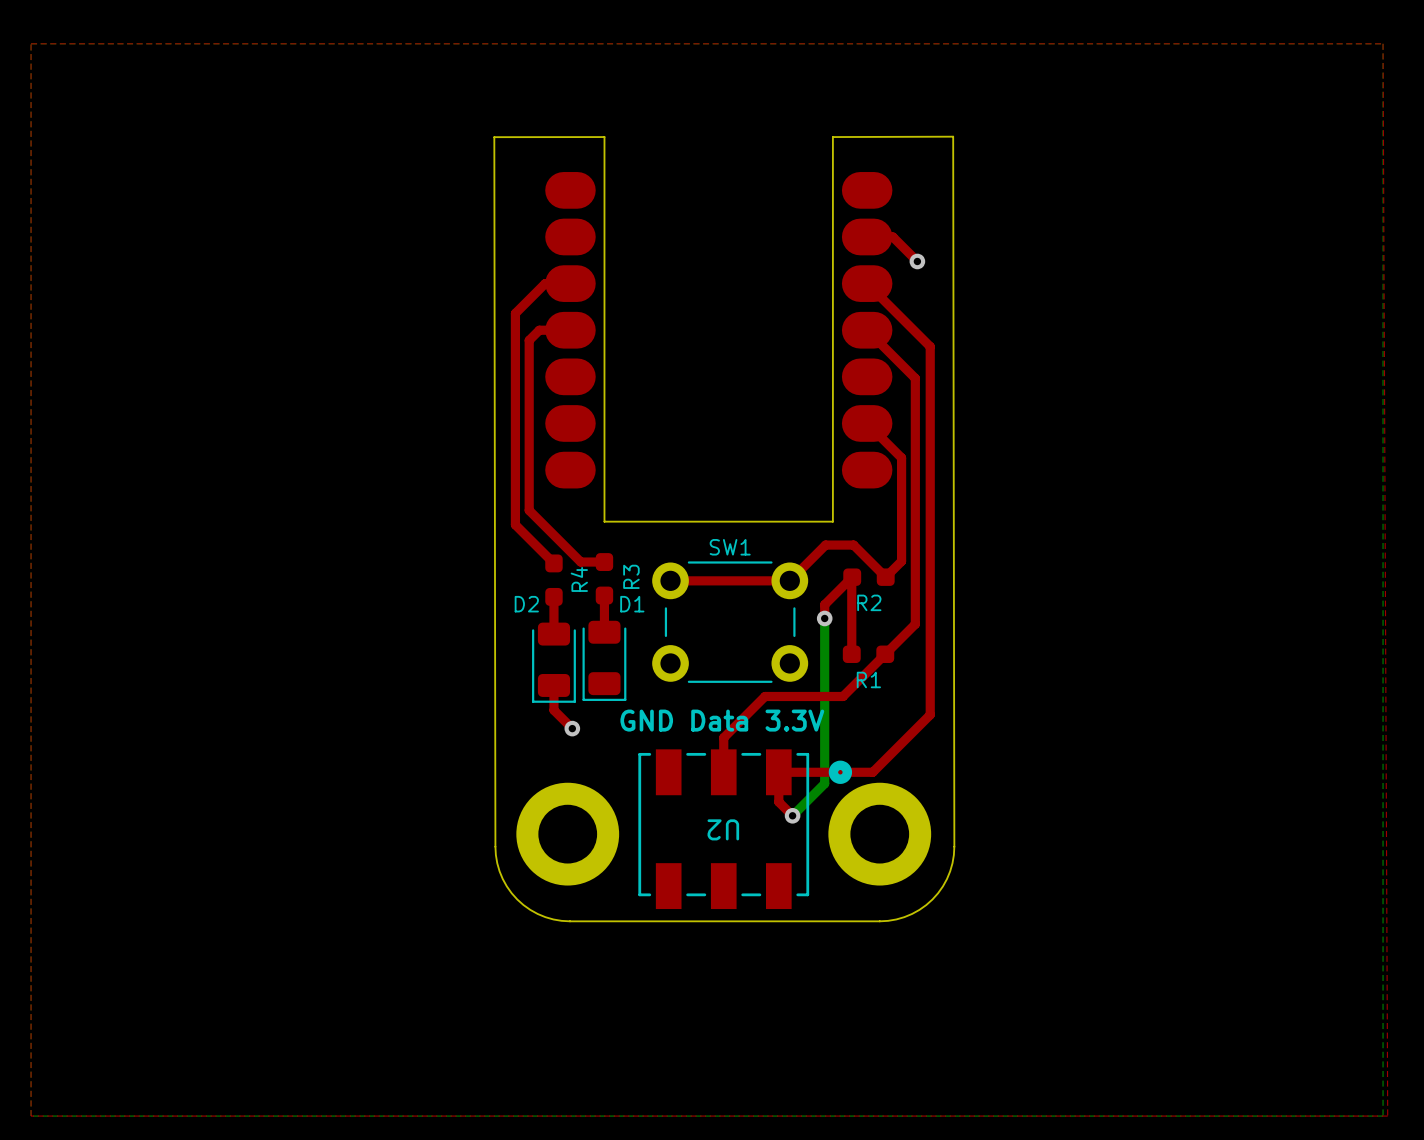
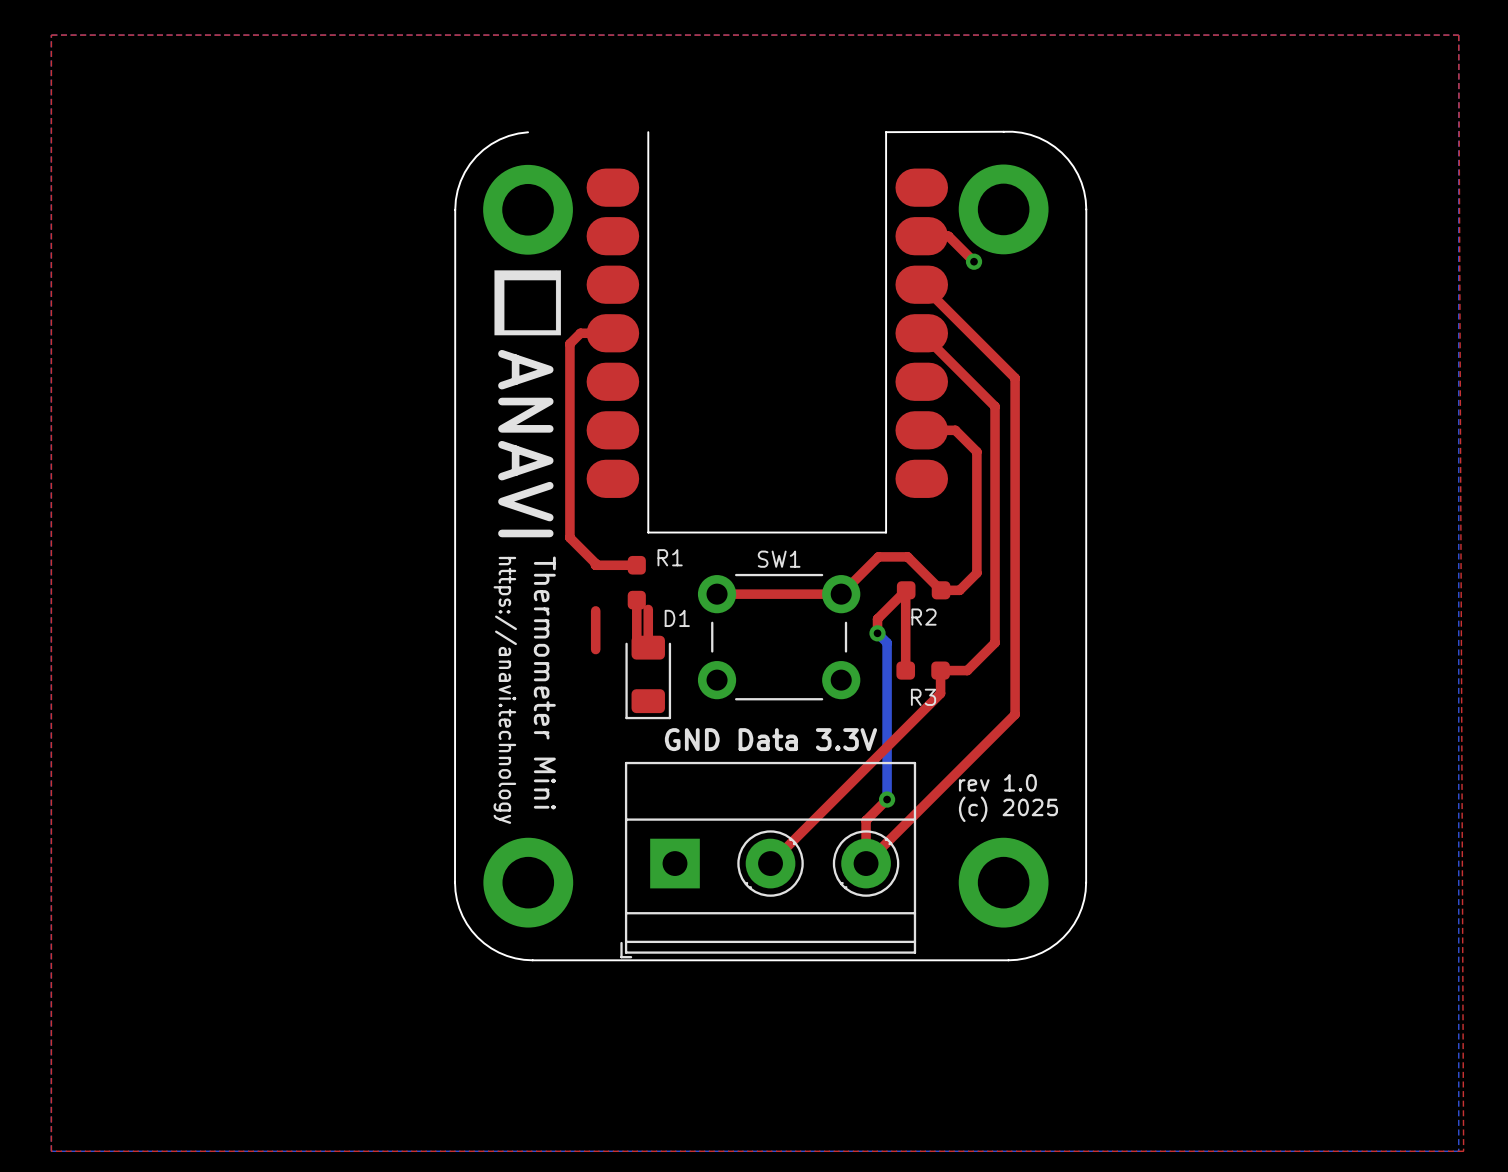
board edge: (604, 137) (494, 137) (495, 846) (499, 871) (506, 886) (523, 905) (537, 913) (561, 920) (888, 920) (912, 913) (932, 899) (946, 879) (953, 855) (953, 136) (832, 137) -> (528, 132) (499, 139) (476, 156) (464, 172) (455, 200) (455, 882) (456, 899) (466, 923) (477, 937) (491, 948) (507, 955) (523, 959) (1017, 959) (1042, 952) (1063, 937) (1078, 916) (1085, 891) (1085, 200) (1077, 174) (1067, 159) (1047, 141) (1030, 134) (1012, 131) (886, 132)
part: none -> (528, 209)
part: none -> (1003, 209)
drawing: none -> [494, 270, 561, 336]
top track: (570, 283) (545, 283) (515, 313) (515, 524) (553, 563) -> none
top track: (930, 346) (930, 714) (872, 772) (778, 772) (778, 802) (792, 815) -> (987, 350) (1015, 378) (1015, 714) (866, 863) (866, 820) (887, 799)
top track: (915, 378) (915, 624) (843, 696) (765, 696) (723, 737) (723, 772) -> (971, 383) (995, 406) (995, 642) (967, 670) (940, 670) (940, 693) (770, 863)
top track: (867, 423) (901, 457) (901, 561) (885, 577) -> (921, 430) (955, 430) (976, 451) (976, 573) (959, 590) (941, 590)
text: none -> ANAVI (525, 443)
top track: (529, 510) (580, 562) (604, 562) -> (569, 520) (569, 537) (595, 565) (636, 565)
R3 name: R3 (631, 576) -> R1 (670, 557)
R3 position: (604, 578) -> (636, 582)
R4: (553, 580) -> none
top track: none -> (636, 600) (636, 647)
bottom track: none -> (876, 632) (887, 642) (887, 799)
bottom track: (824, 618) (824, 783) (792, 815) -> none
D2: (553, 662) -> none
text: none -> Thermometer Mini (544, 683)
text: none -> https://anavi.technology (505, 690)
R1 name: R1 (868, 679) -> R3 (923, 697)
top track: (553, 685) (553, 710) (572, 728) -> none
via: (572, 728) -> none
text: none -> rev 1.0 (997, 782)
text: none -> (c) 2025 (1008, 809)
via position: (792, 815) -> (887, 799)
U2: (745, 829) -> none
part: (567, 834) -> none
part: (879, 834) -> none
part: none -> (768, 860)
part: none -> (528, 882)
part: none -> (1003, 882)

